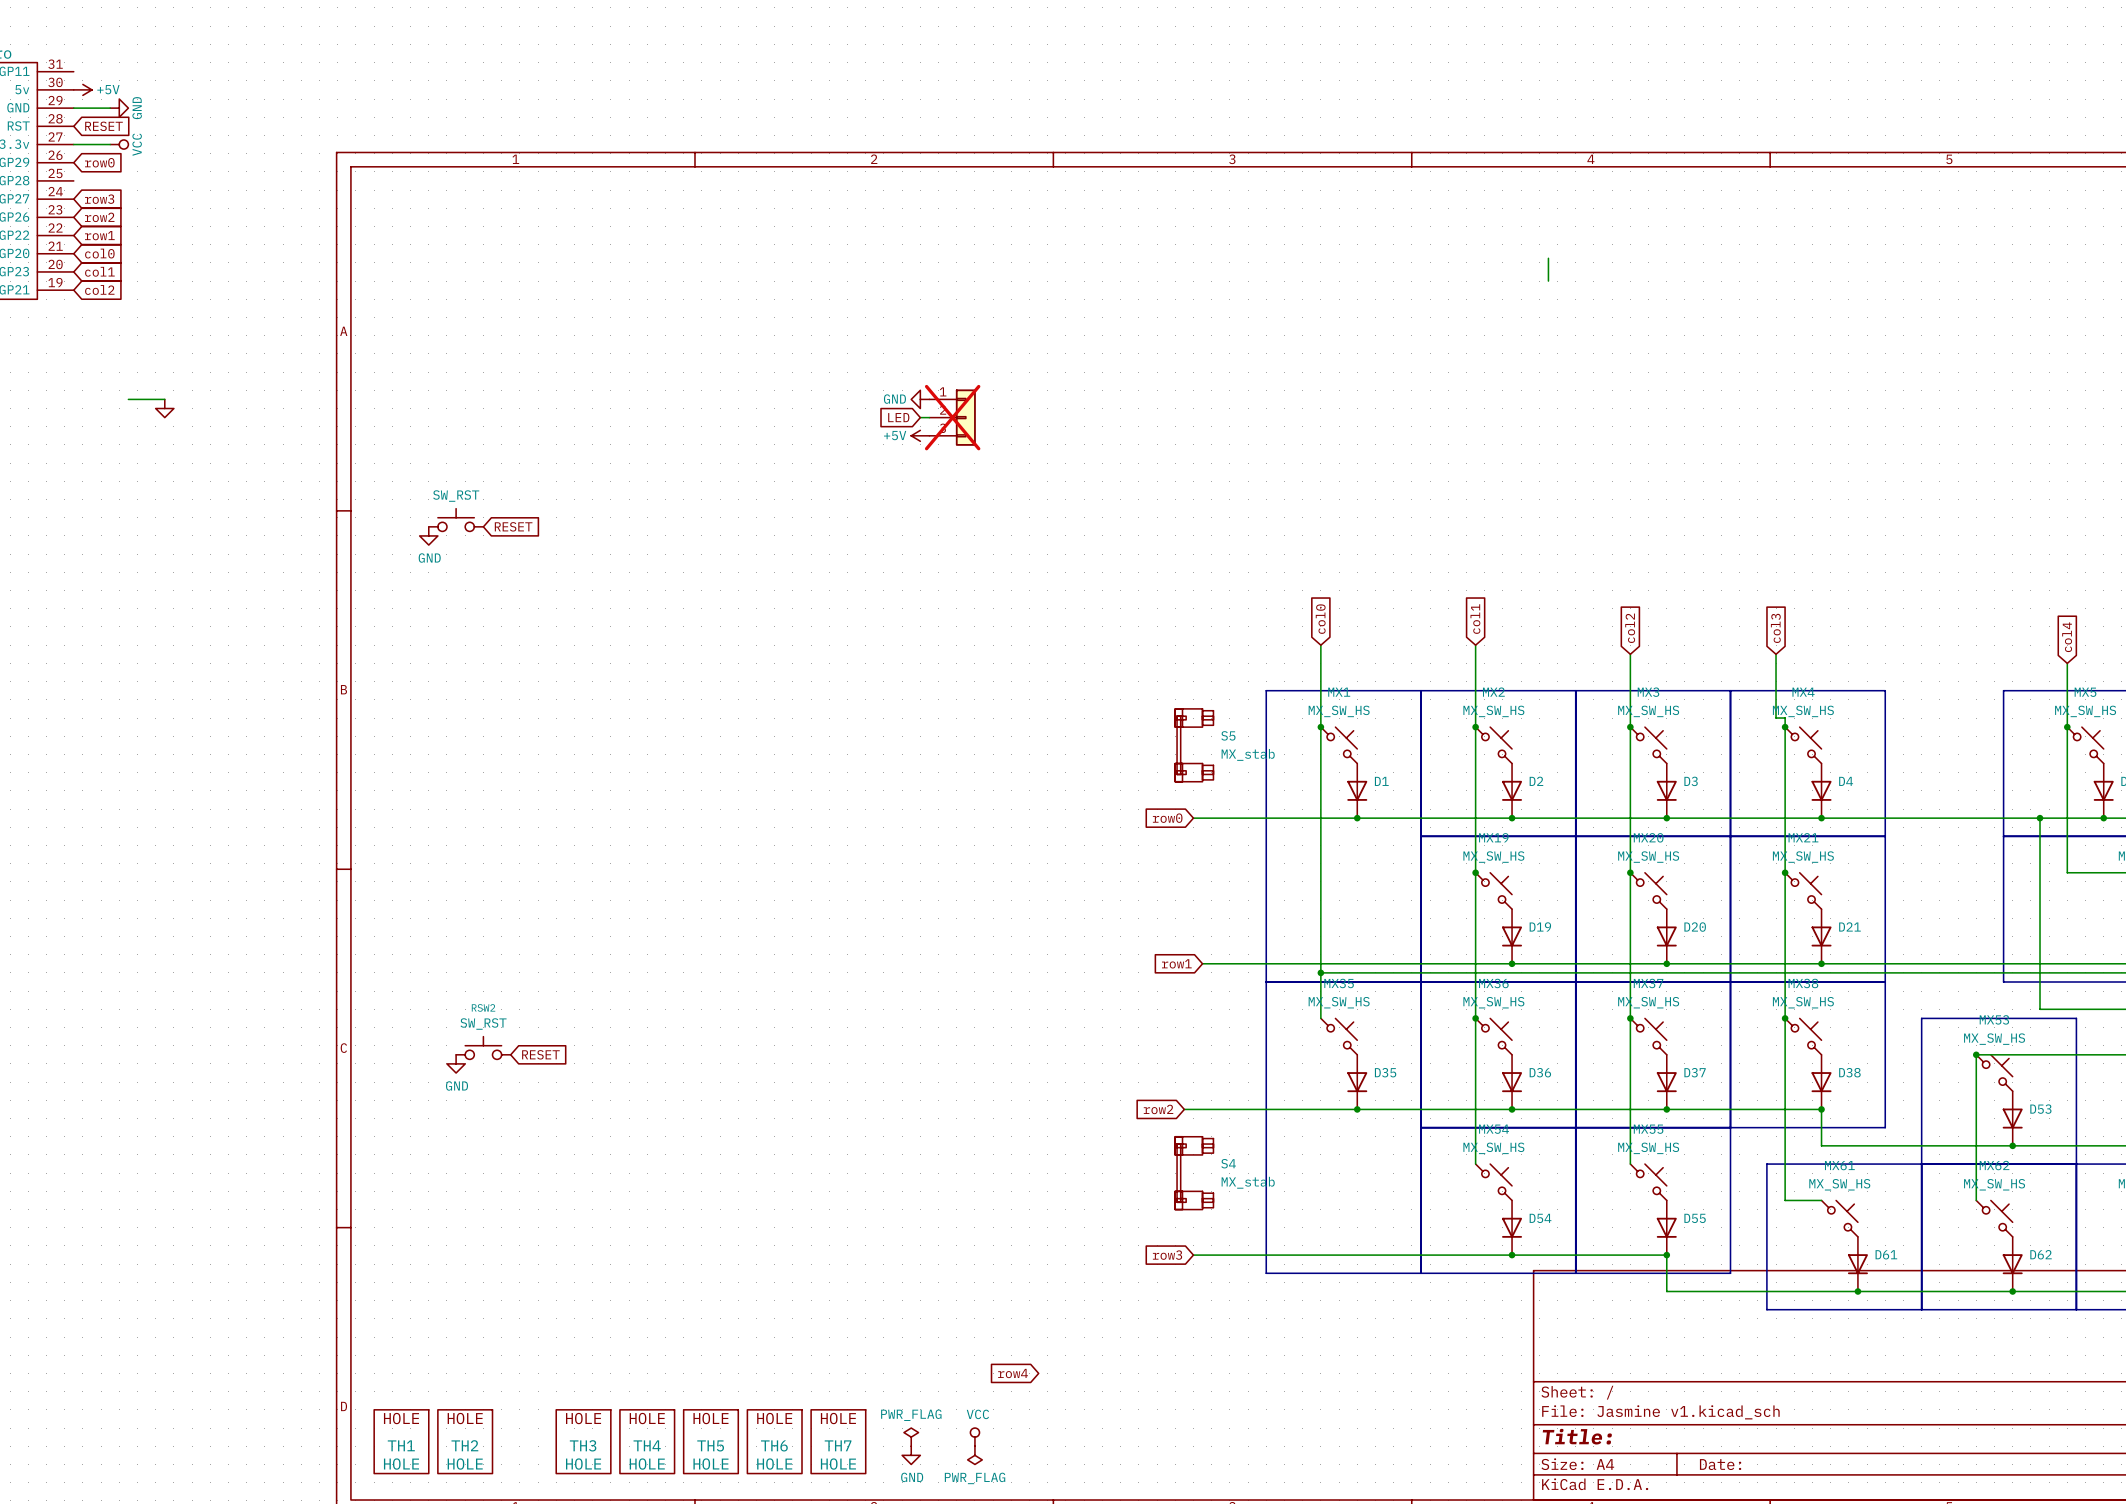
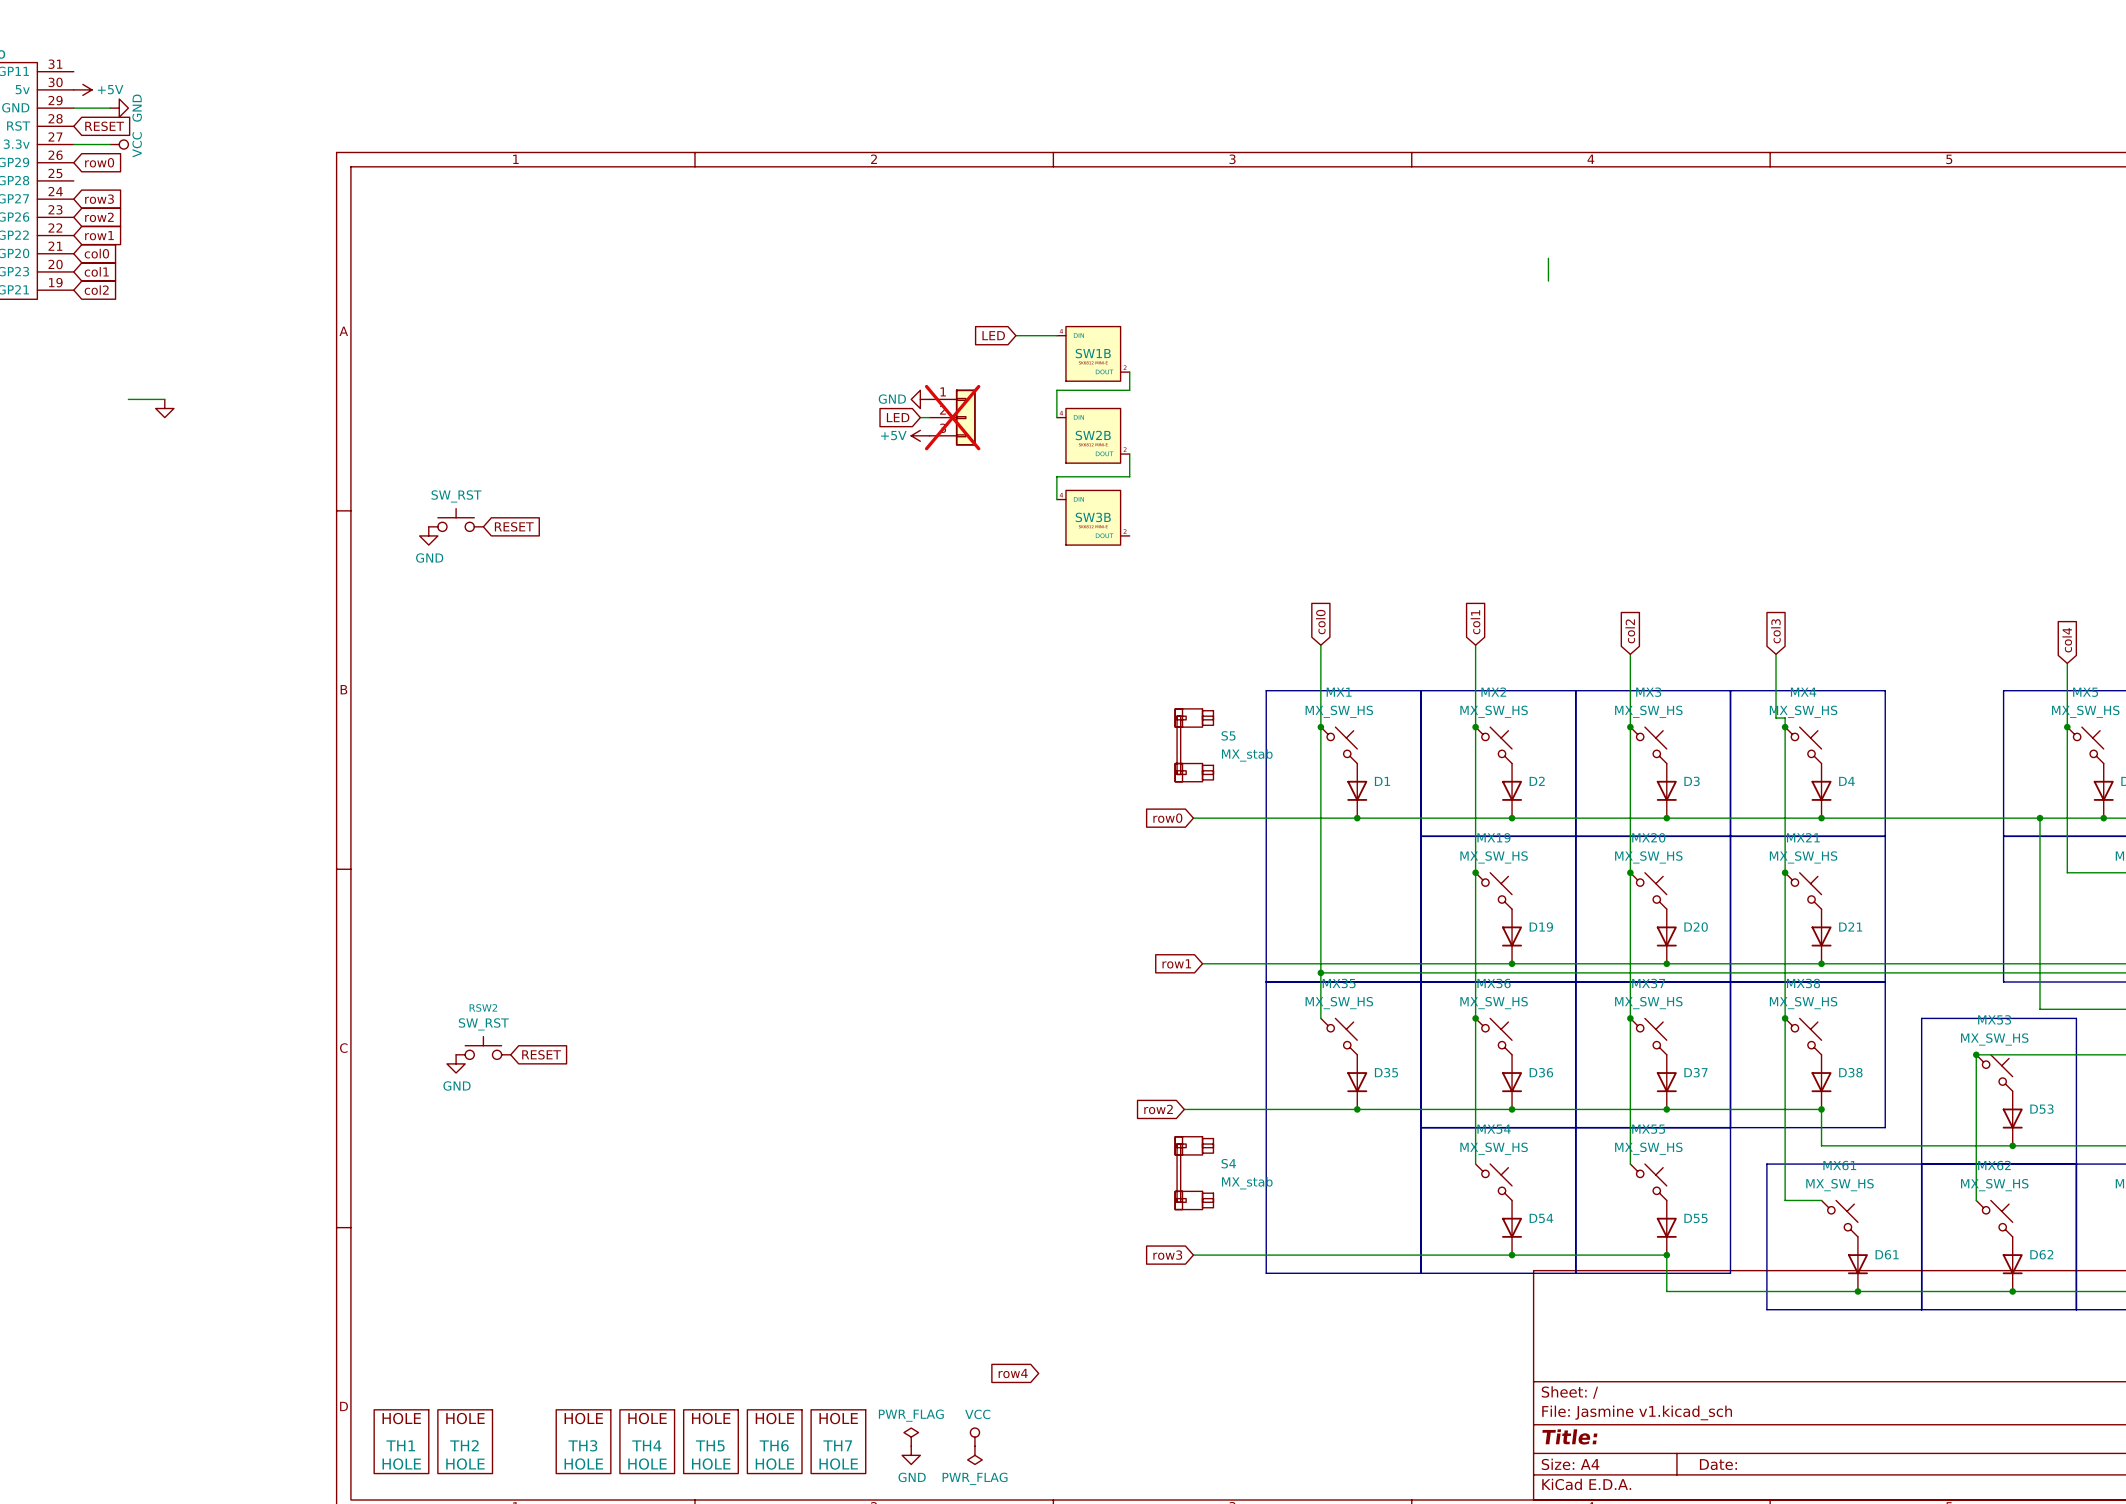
global label: none -> LED (993, 335)
wire: none -> (1015, 335) (1056, 335)
SW1B: none -> (1093, 353)
wire: none -> (1129, 372) (1129, 390) (1056, 390) (1056, 417)
SW2B: none -> (1093, 435)
wire: none -> (1129, 454) (1129, 476) (1056, 476) (1056, 499)
SW3B: none -> (1093, 517)

